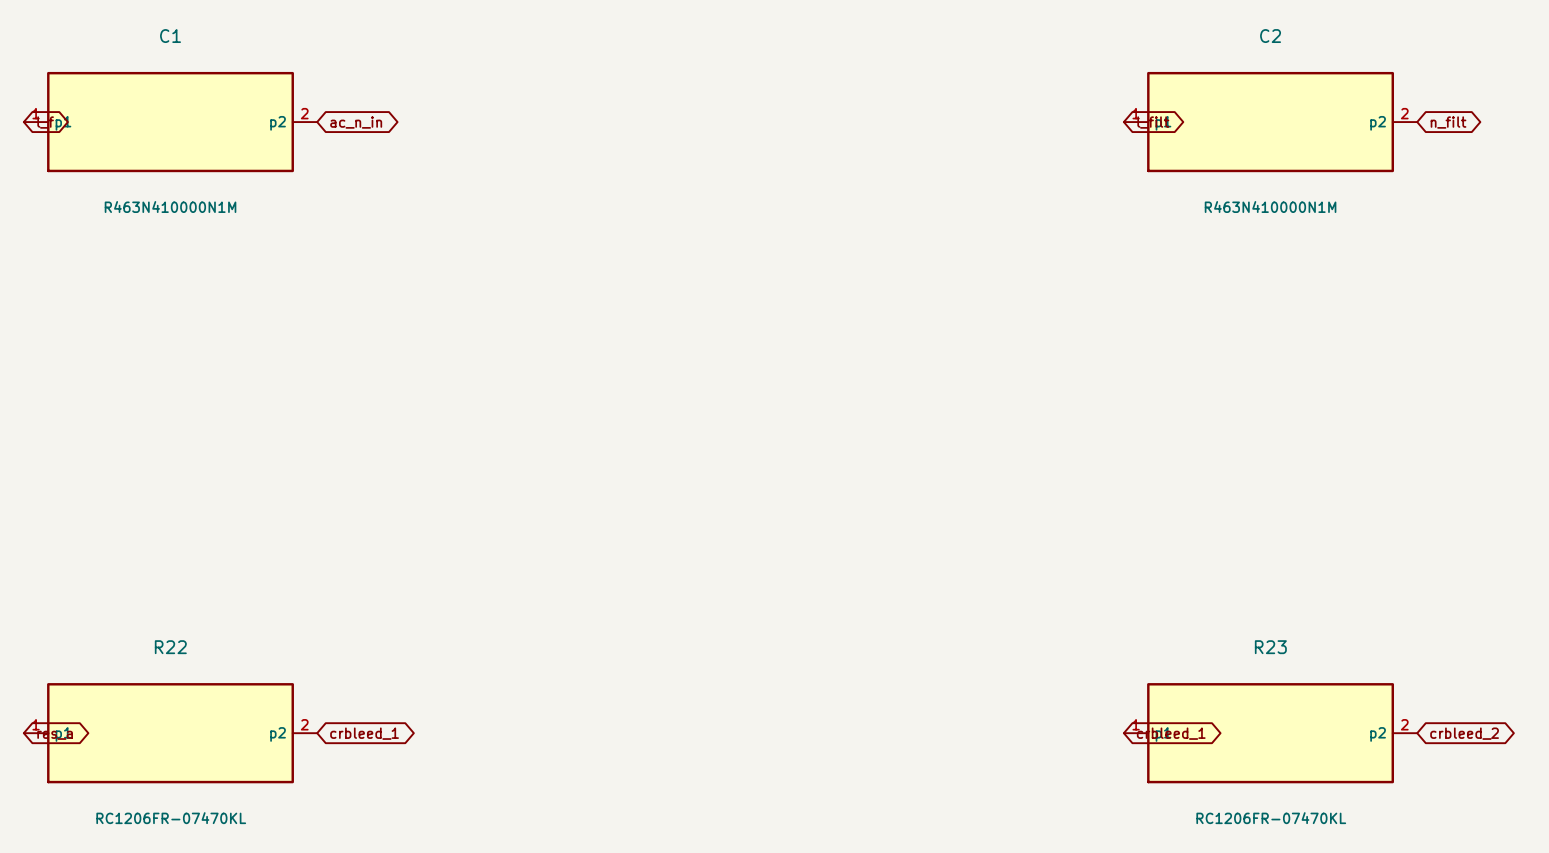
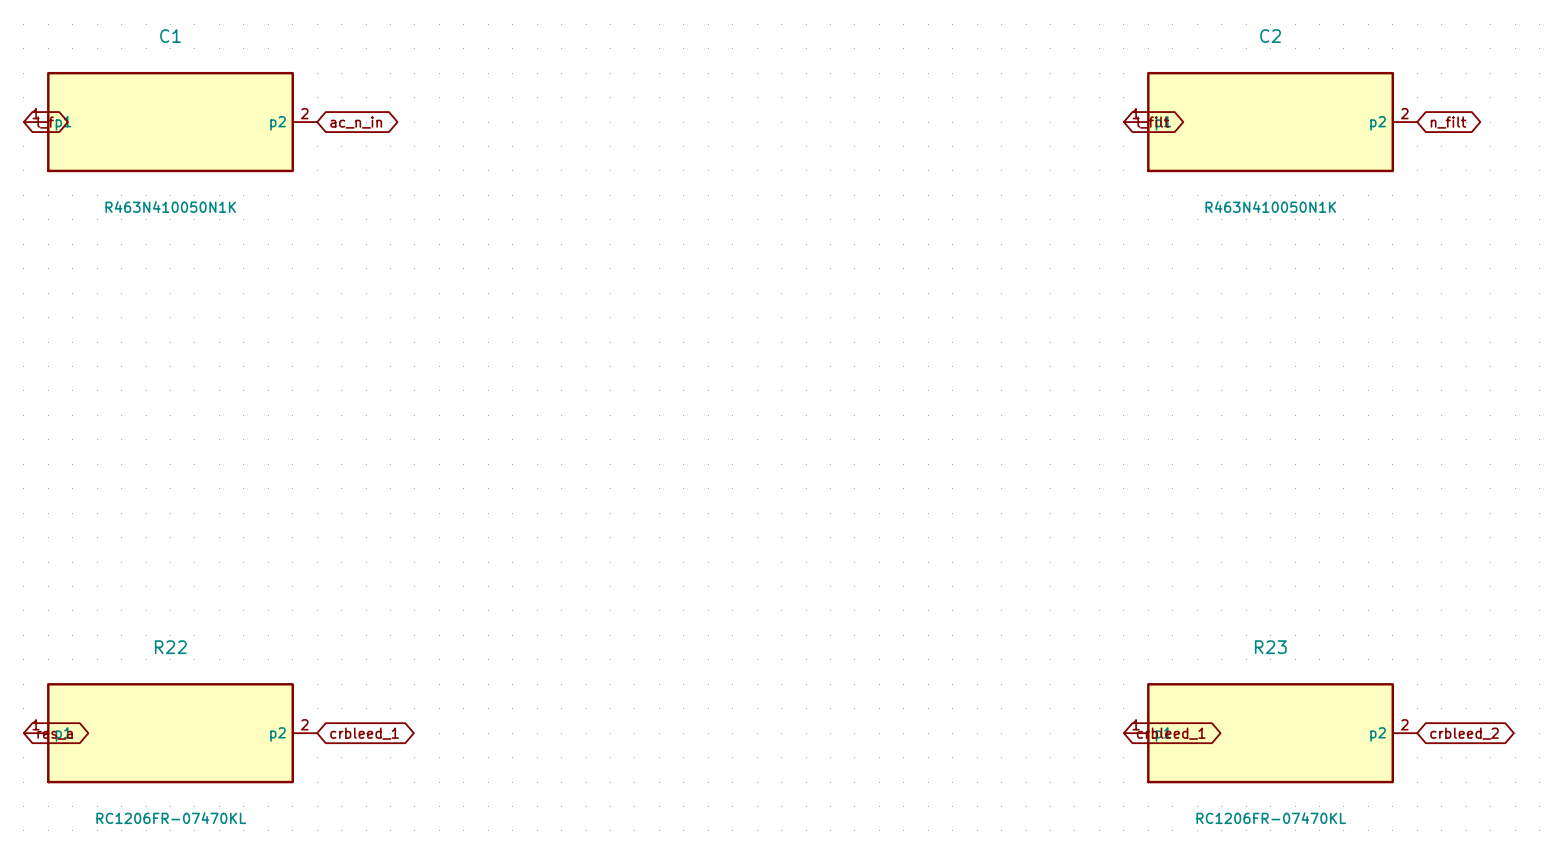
C1 value: R463N410000N1M (170, 207) -> R463N410050N1K (170, 207)
C2 value: R463N410000N1M (1270, 207) -> R463N410050N1K (1270, 207)

